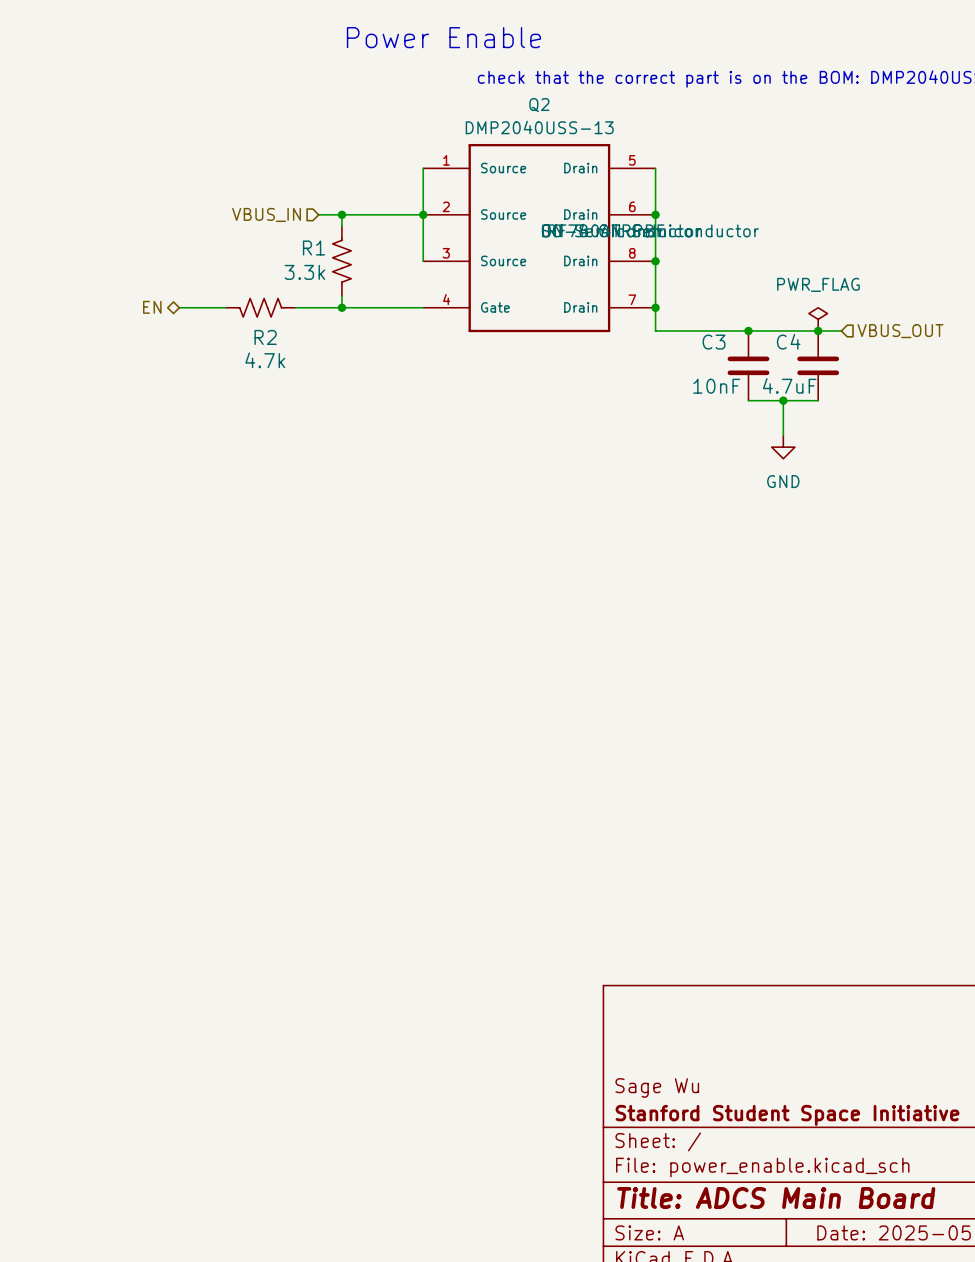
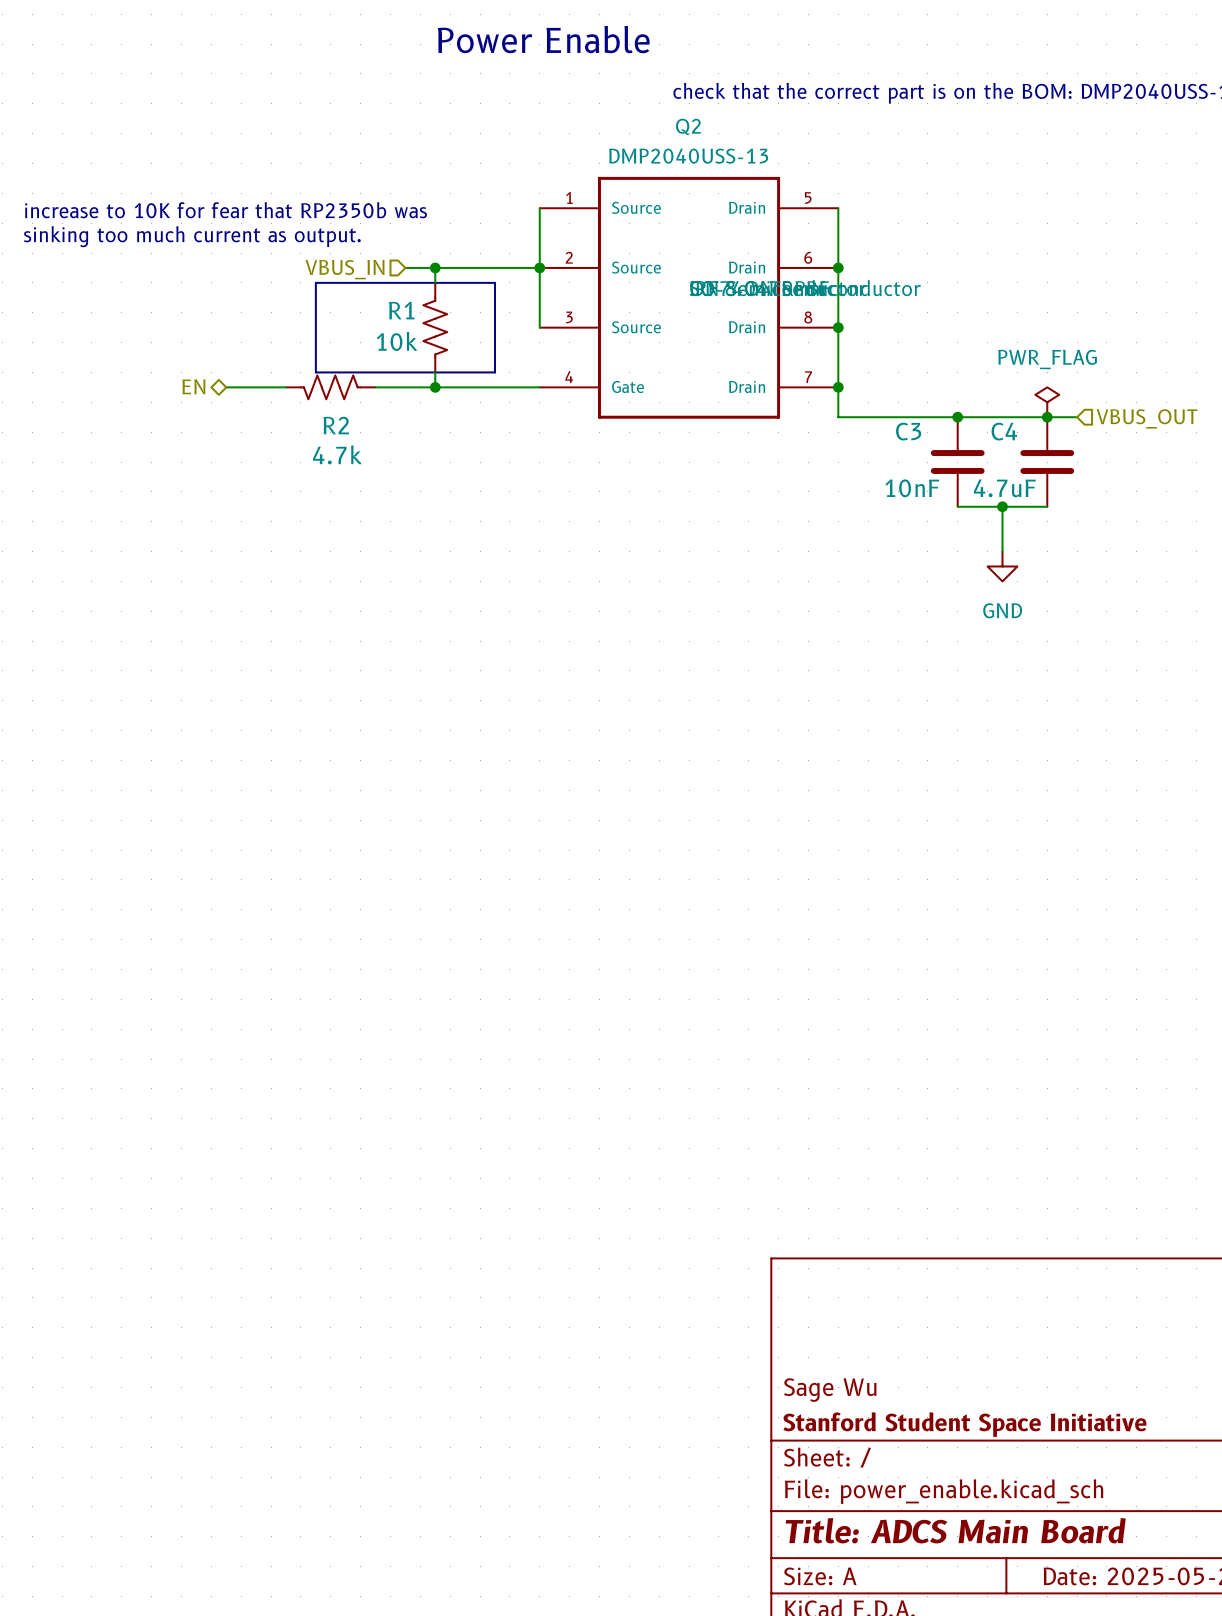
text: none -> increase to 10K for fear that RP2350b was (226, 210)
text: none -> sinking too much current as output. (192, 236)
line: none -> (315, 282) (494, 282) (494, 372) (315, 372) (315, 282)
R1 value: 3.3k (304, 272) -> 10k (397, 341)

